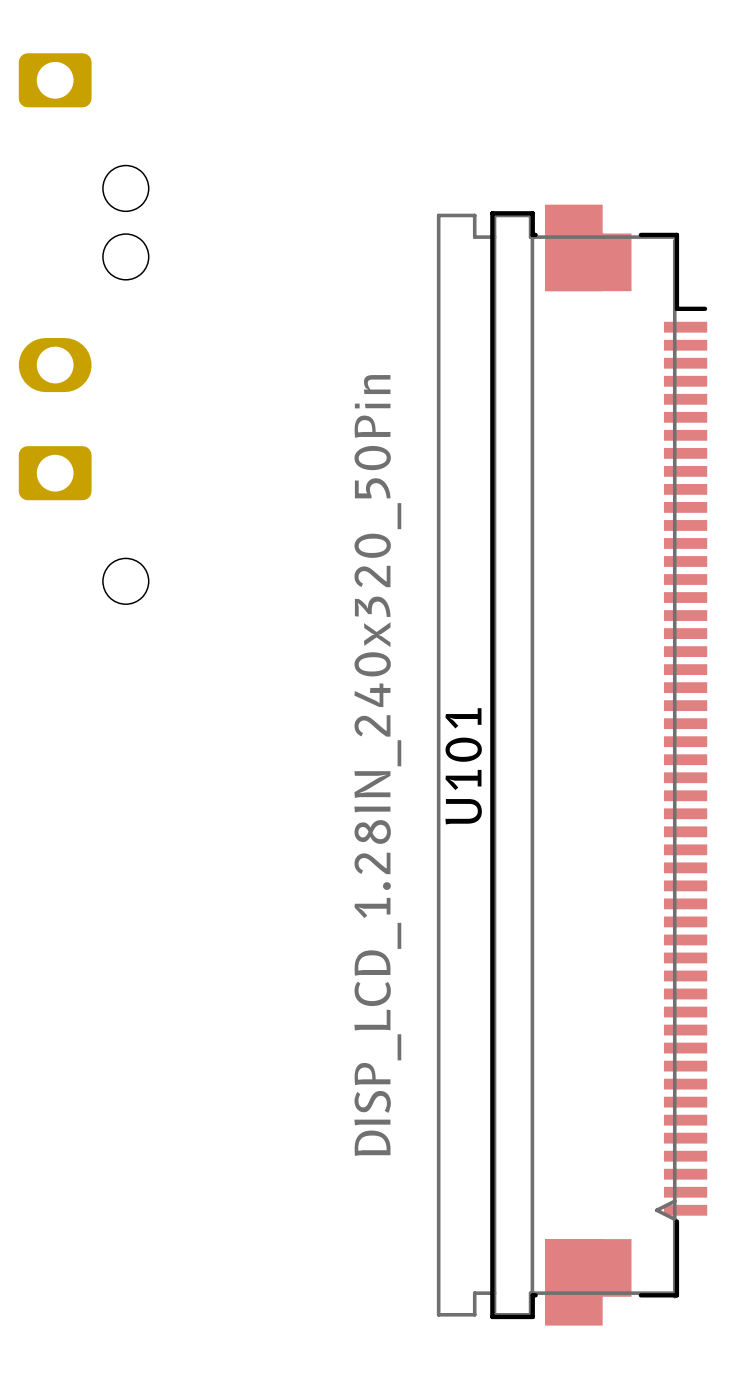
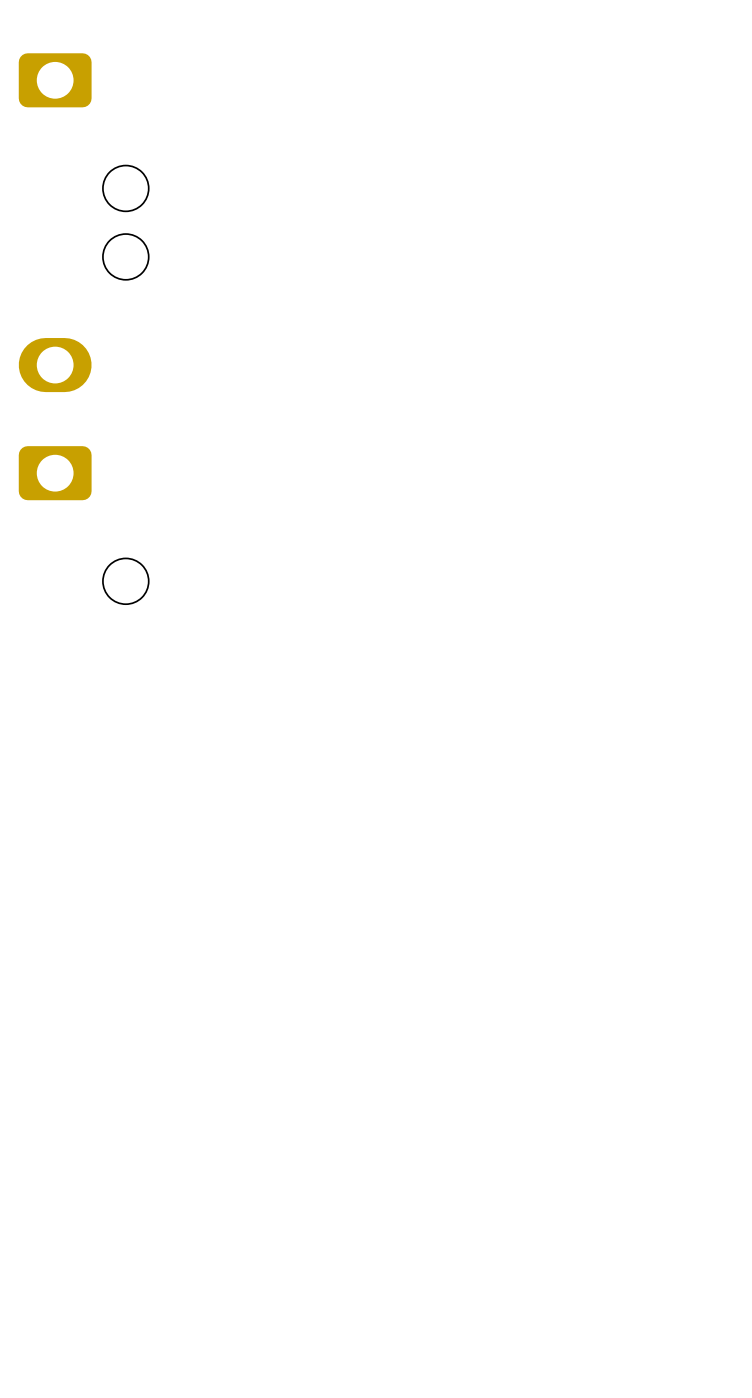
U101: DISP_LCD_1.28IN_240x320_50Pin (572, 765) -> none

